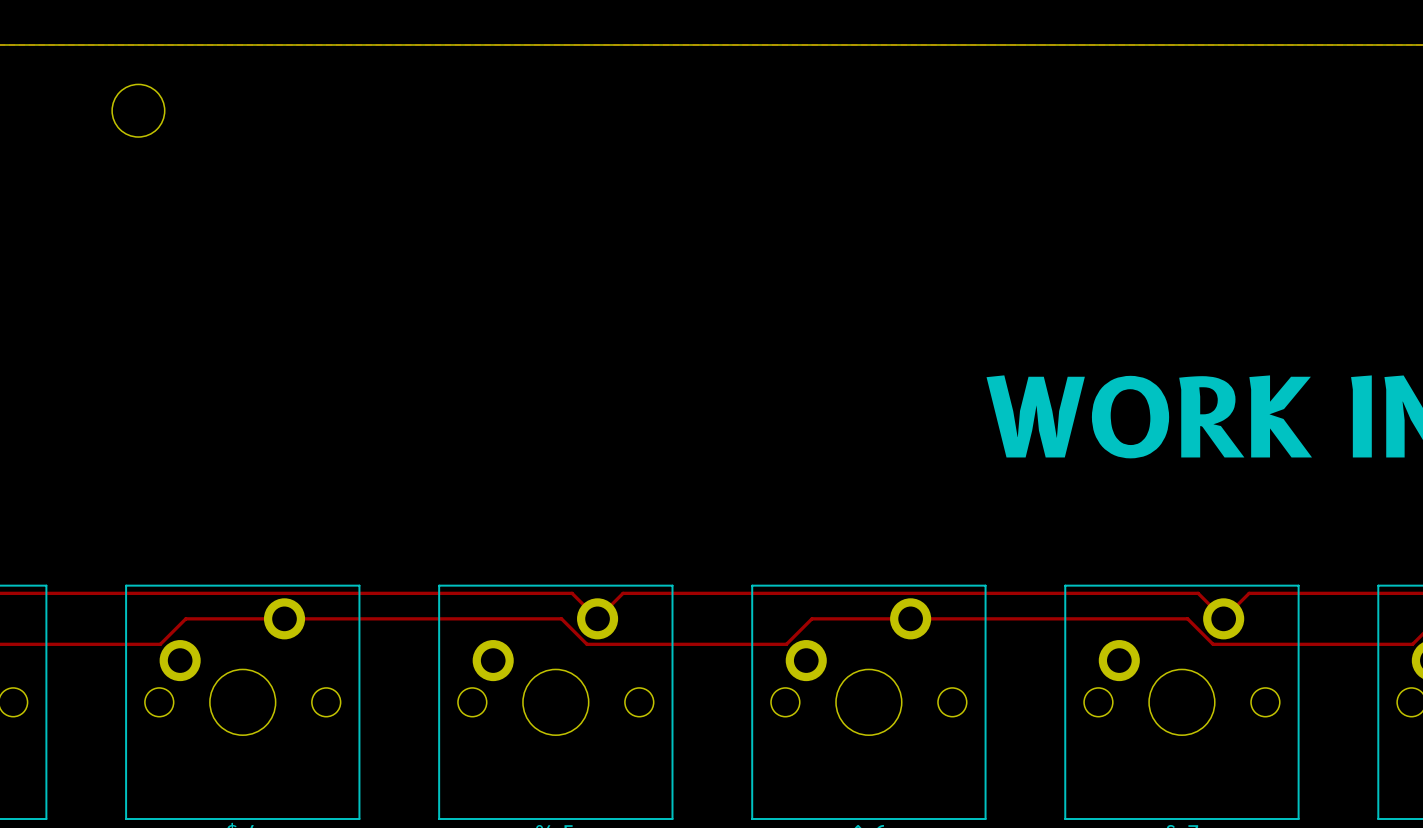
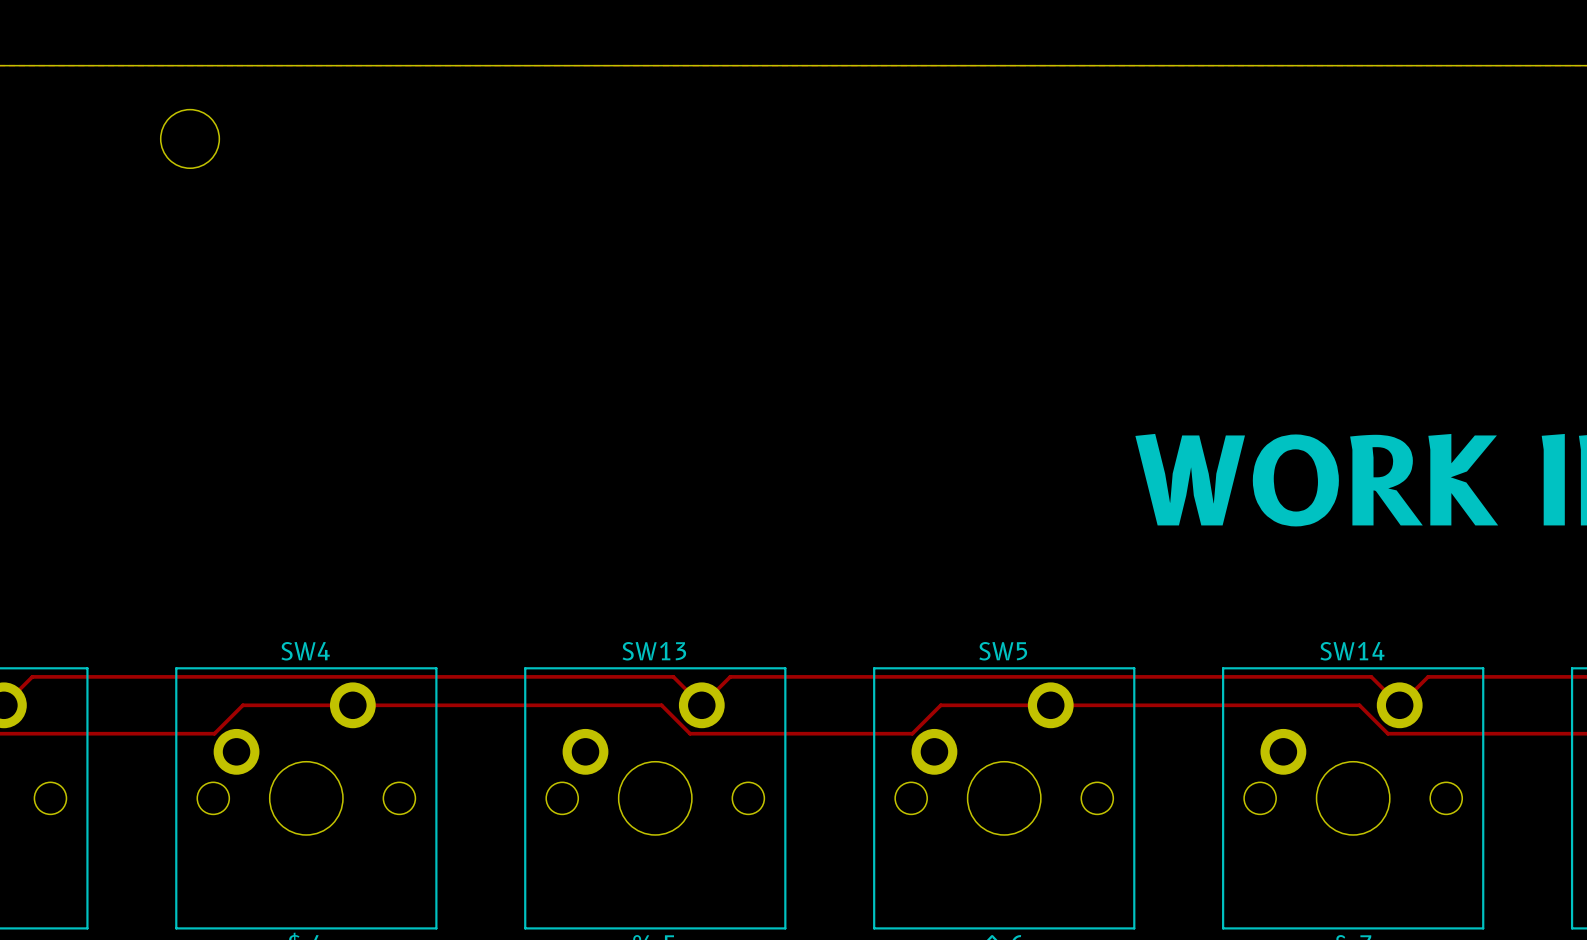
SW4 name: none -> SW4 (305, 651)
SW13 name: none -> SW13 (654, 651)
SW5 name: none -> SW5 (1003, 651)
SW14 name: none -> SW14 (1352, 651)

